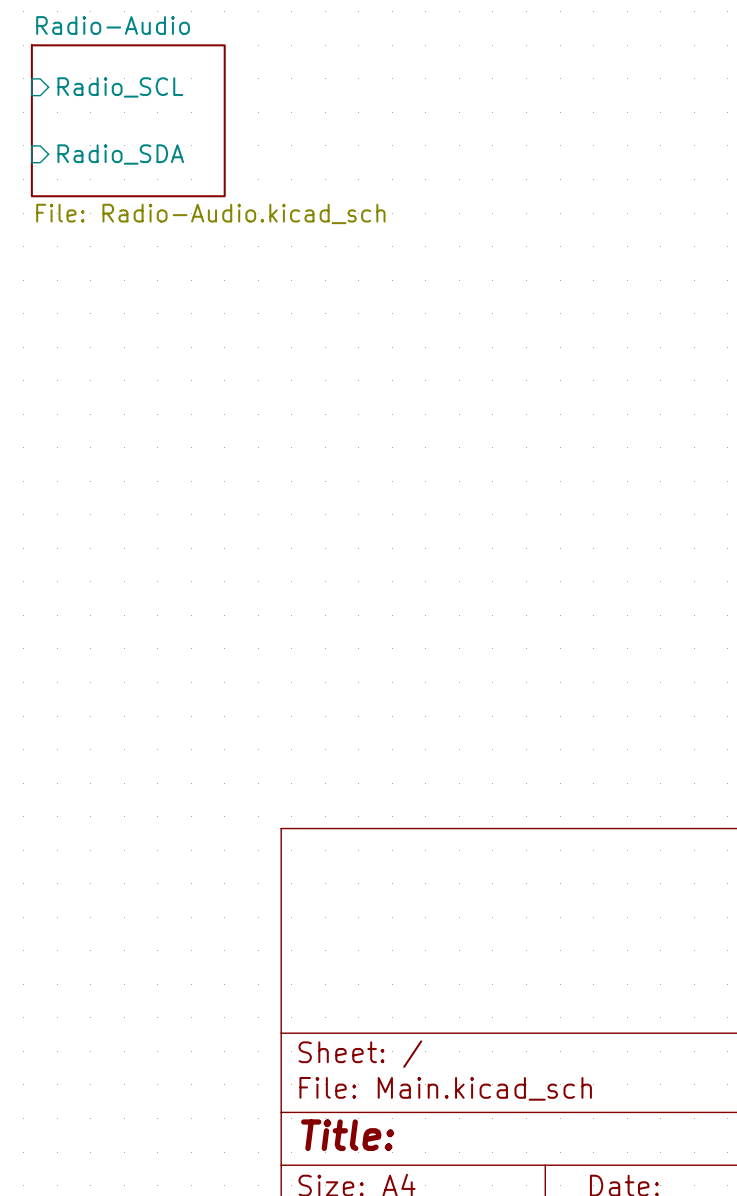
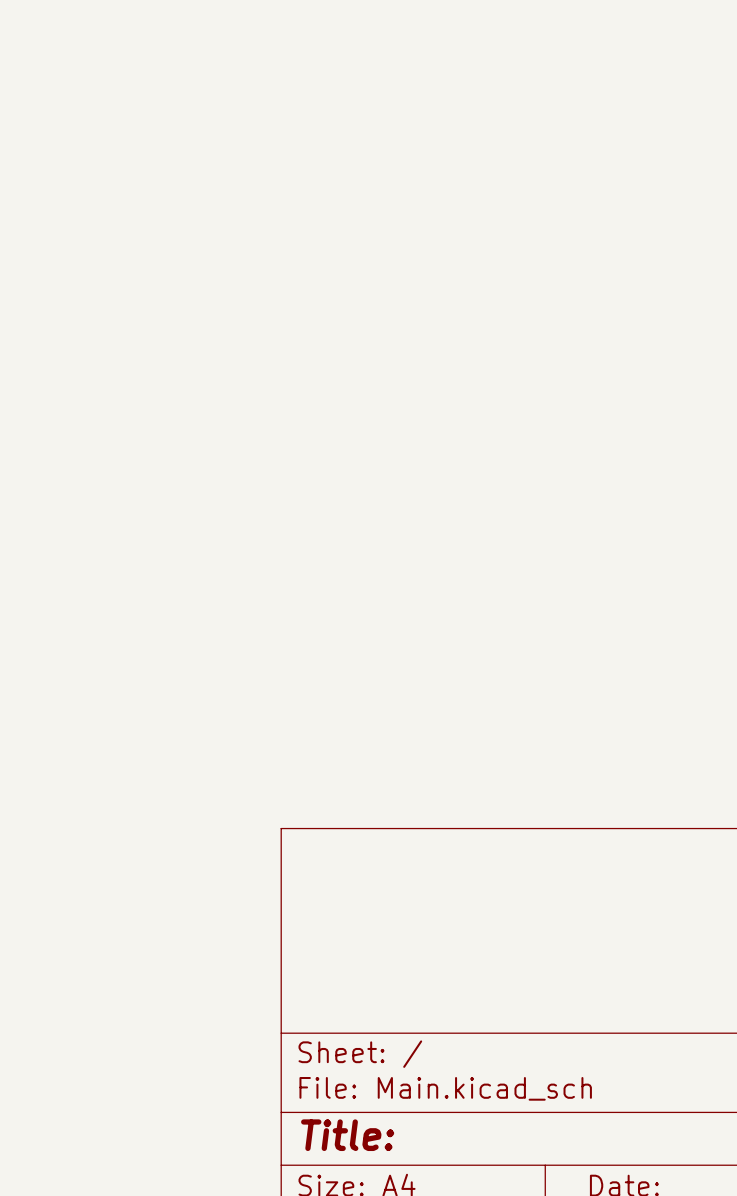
sheet pin: Radio_SCL (120, 87) -> none
sheet Radio-Audio: File: Radio-Audio.kicad_sch (128, 120) -> none
sheet pin: Radio_SDA (120, 154) -> none

